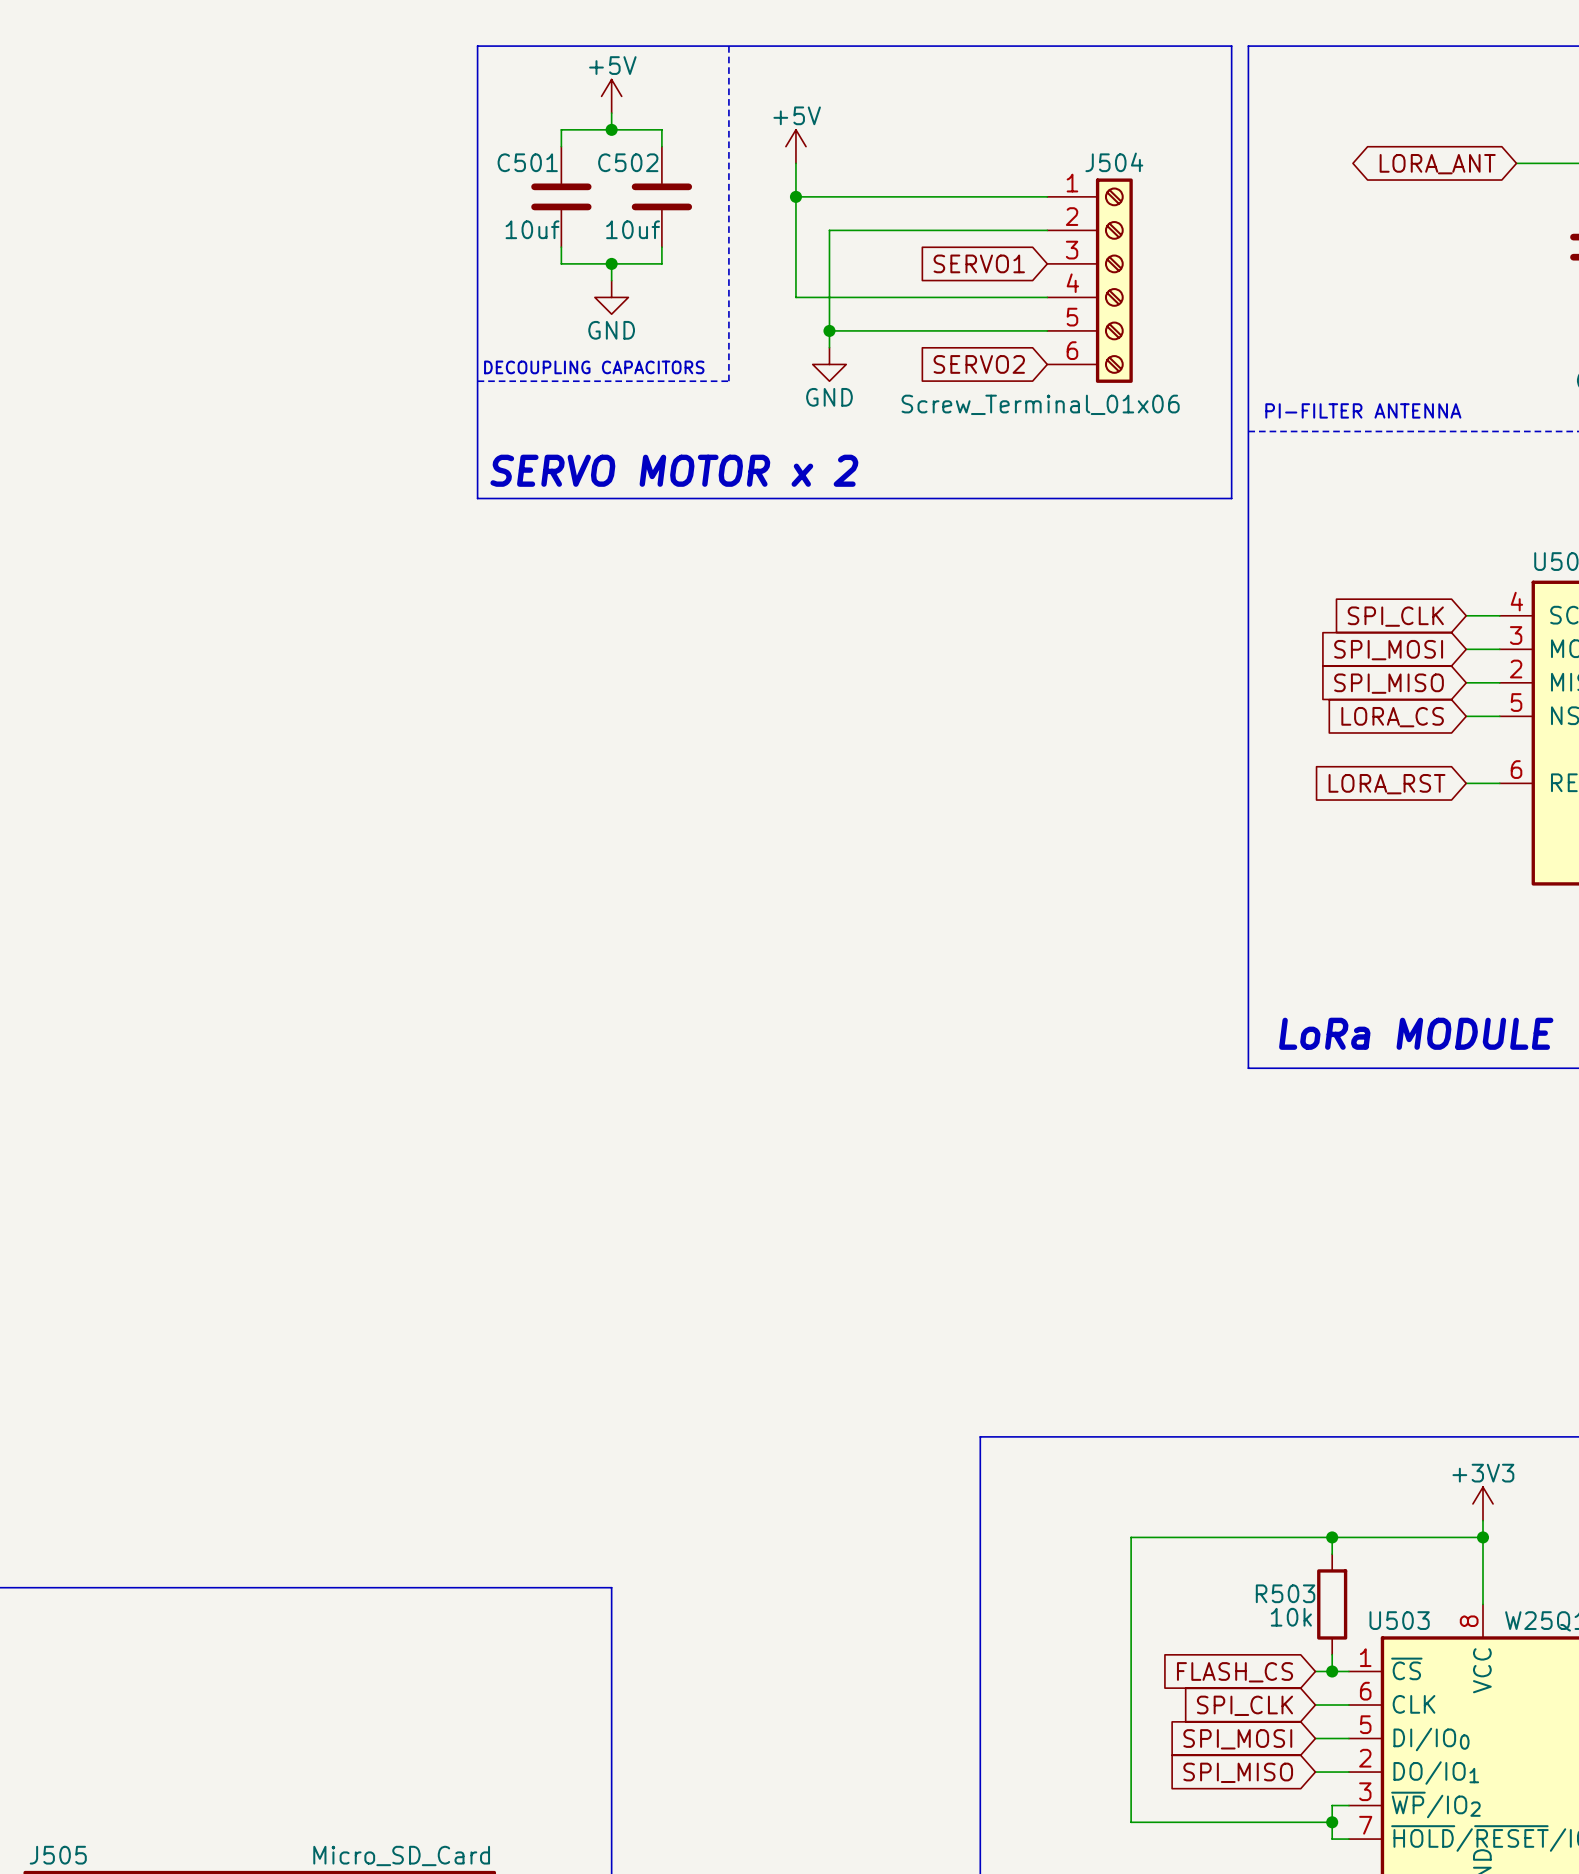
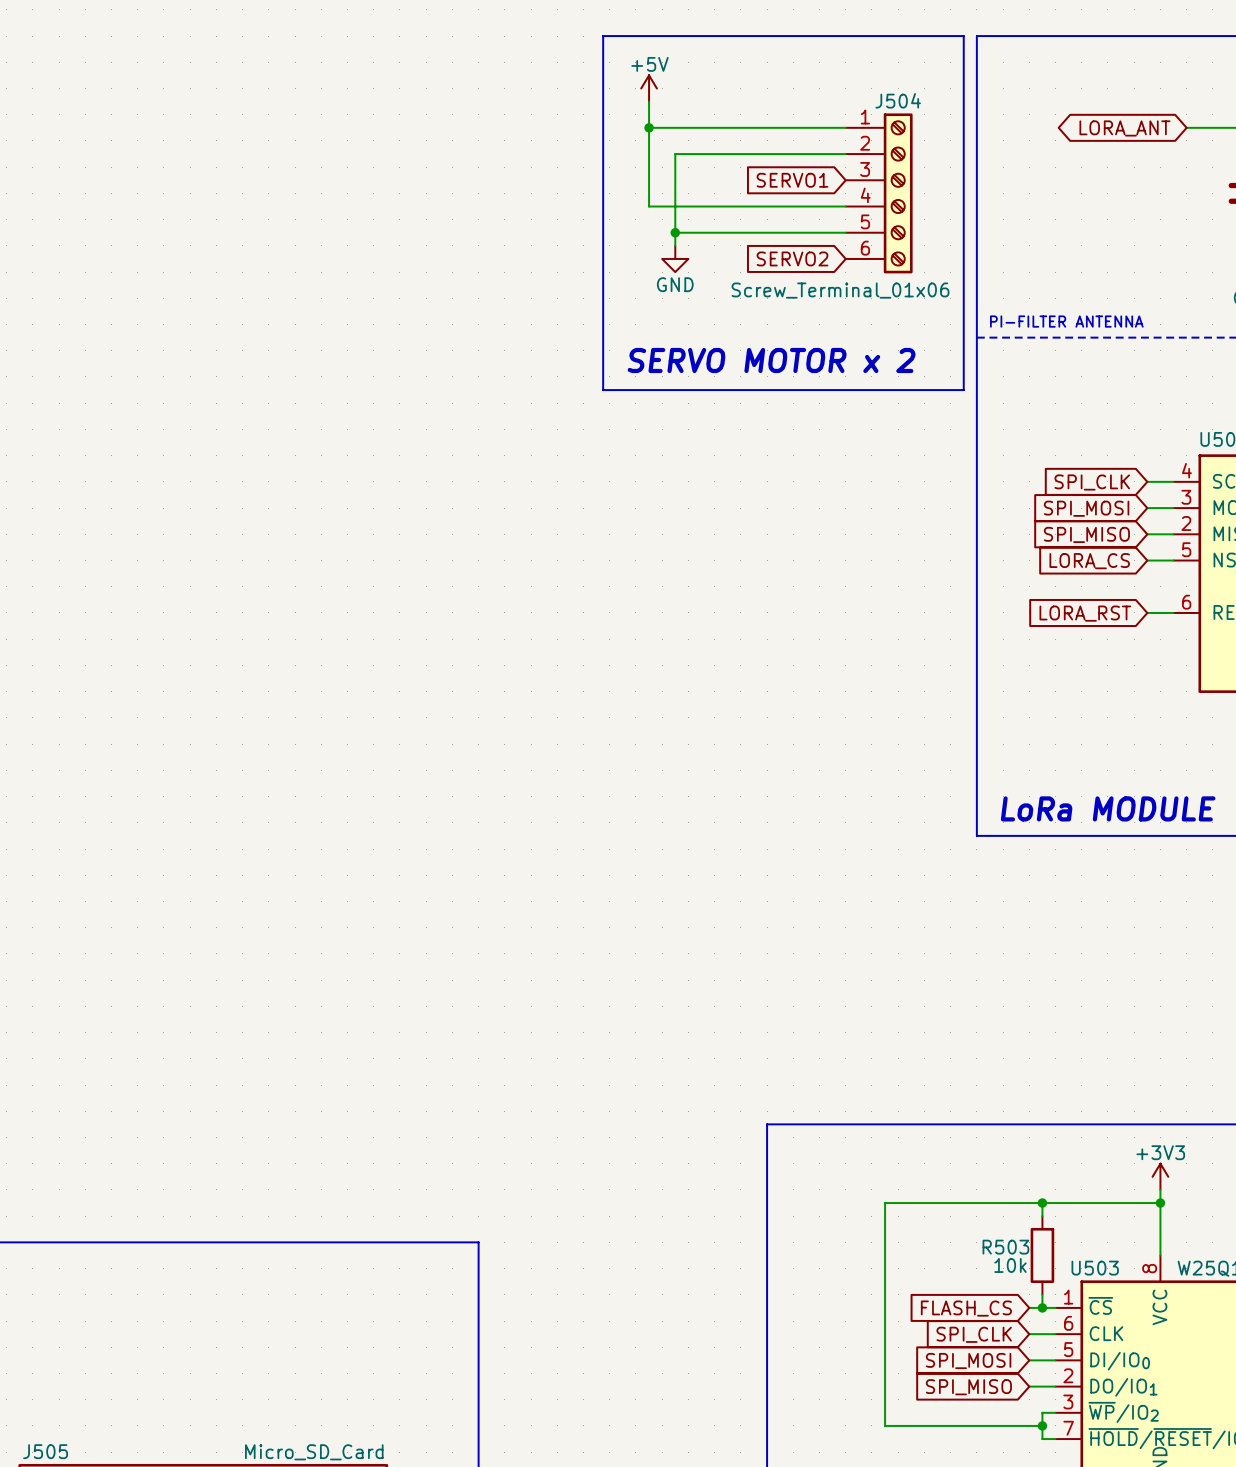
line: (728, 46) (728, 381) (477, 381) -> none
line: (770, 46) (477, 46) (477, 498) (770, 498) -> (603, 36) (603, 390)
power symbol: +5V (611, 96) -> none
wire: (611, 113) (611, 129) -> none
junction: (611, 129) -> none
wire: (561, 146) (561, 129) (661, 129) (661, 146) -> none
power symbol position: +5V (795, 146) -> +5V (649, 88)
wire: (795, 163) (795, 297) (862, 297) -> none
wire: none -> (649, 127) (845, 127)
C501: 10uf (561, 196) -> none
C502: 10uf (661, 196) -> none
wire: (795, 196) (862, 196) -> (675, 245) (675, 154)
junction position: (795, 196) -> (649, 127)
wire: (829, 230) (1047, 230) -> (649, 180) (649, 101)
wire: (561, 247) (561, 263) (661, 263) (661, 247) -> none
wire: (611, 263) (611, 280) -> none
junction: (611, 263) -> none
wire: (829, 263) (829, 347) -> (649, 206) (845, 206)
global label position: SERVO1 (979, 263) -> SERVO1 (792, 180)
J504 position: (1090, 280) -> (879, 193)
power symbol: GND (611, 297) -> none
wire: (829, 330) (1047, 330) -> none
junction position: (829, 330) -> (675, 232)
power symbol position: GND (829, 364) -> GND (675, 258)
global label position: SERVO2 (979, 364) -> SERVO2 (792, 258)
text: DECOUPLING CAPACITORS (594, 367) -> none
text position: SERVO MOTOR x 2 (674, 470) -> SERVO MOTOR x 2 (771, 360)

